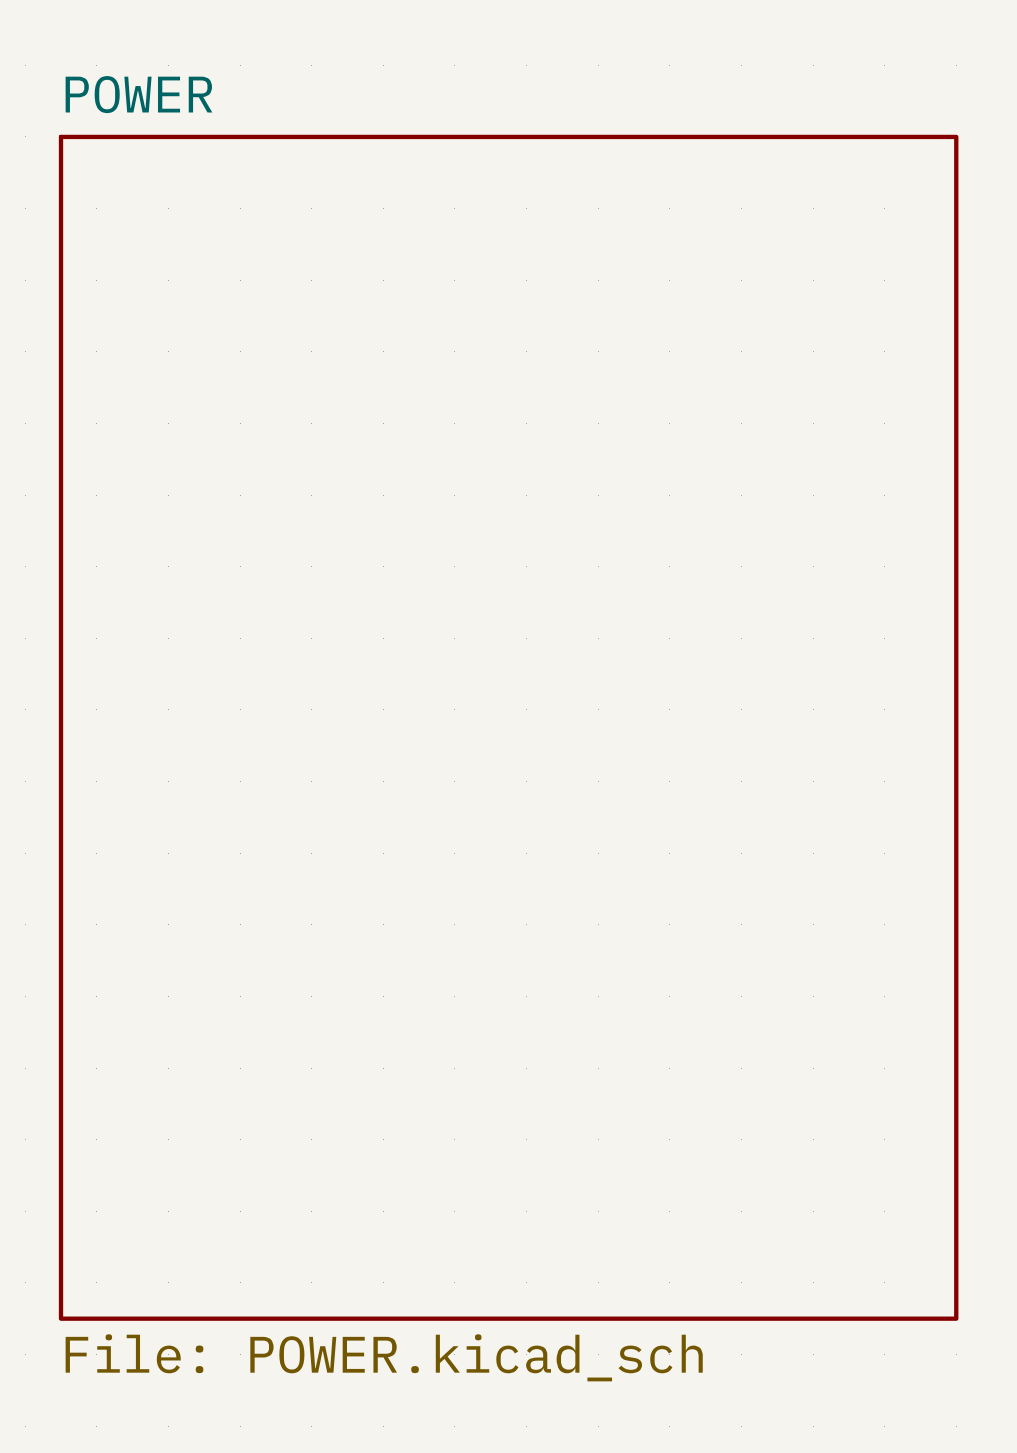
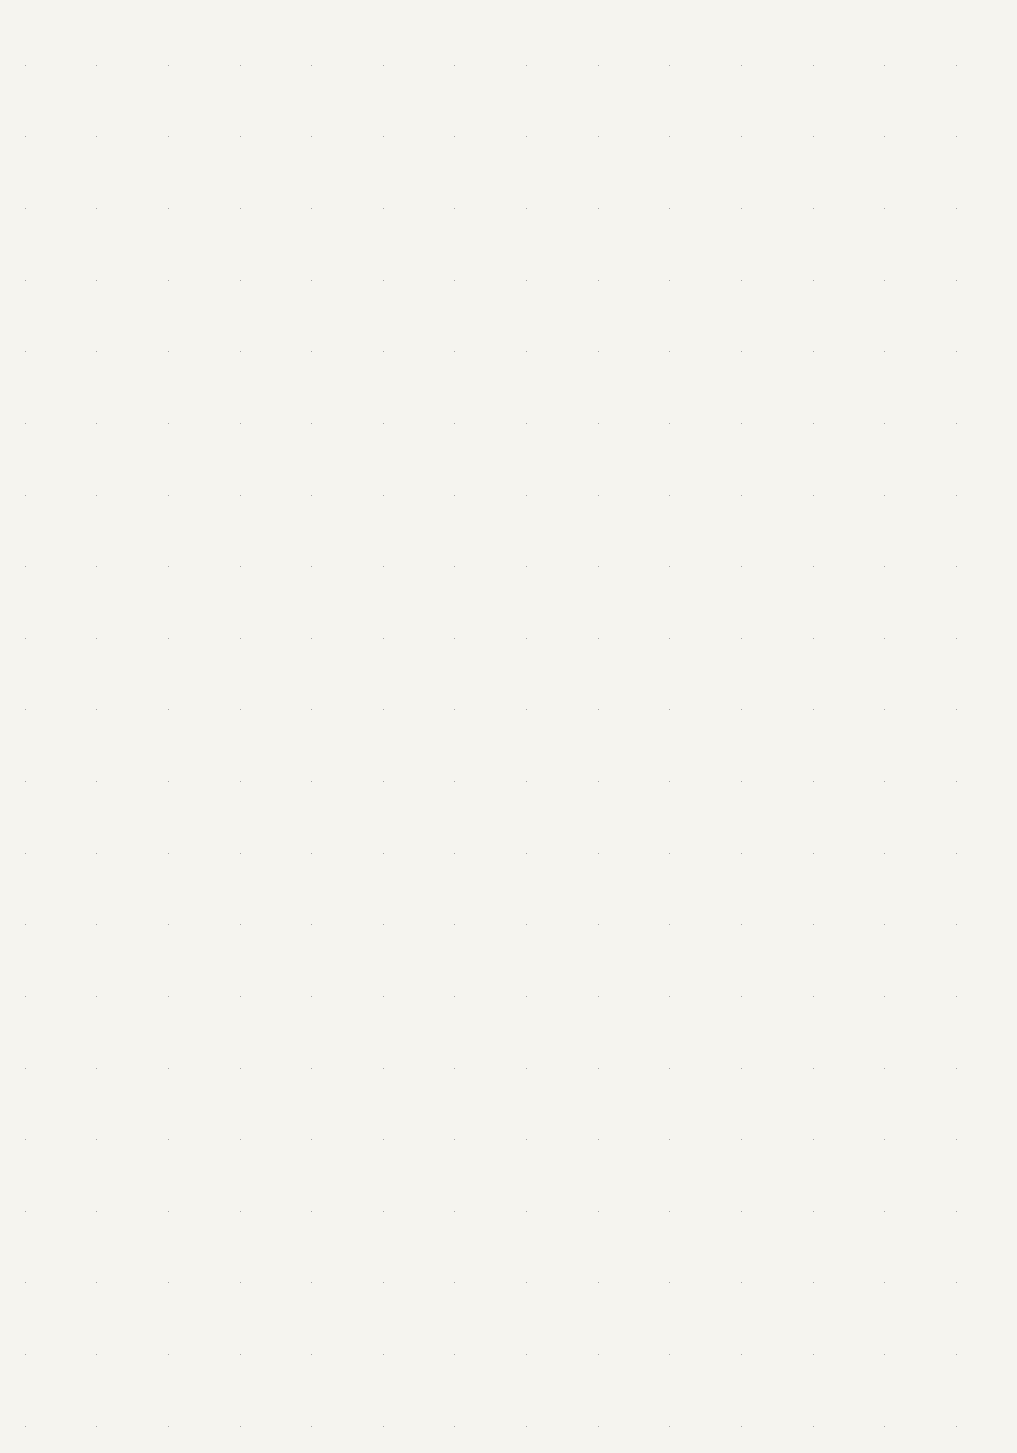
sheet POWER: File: POWER.kicad_sch (508, 727) -> none

